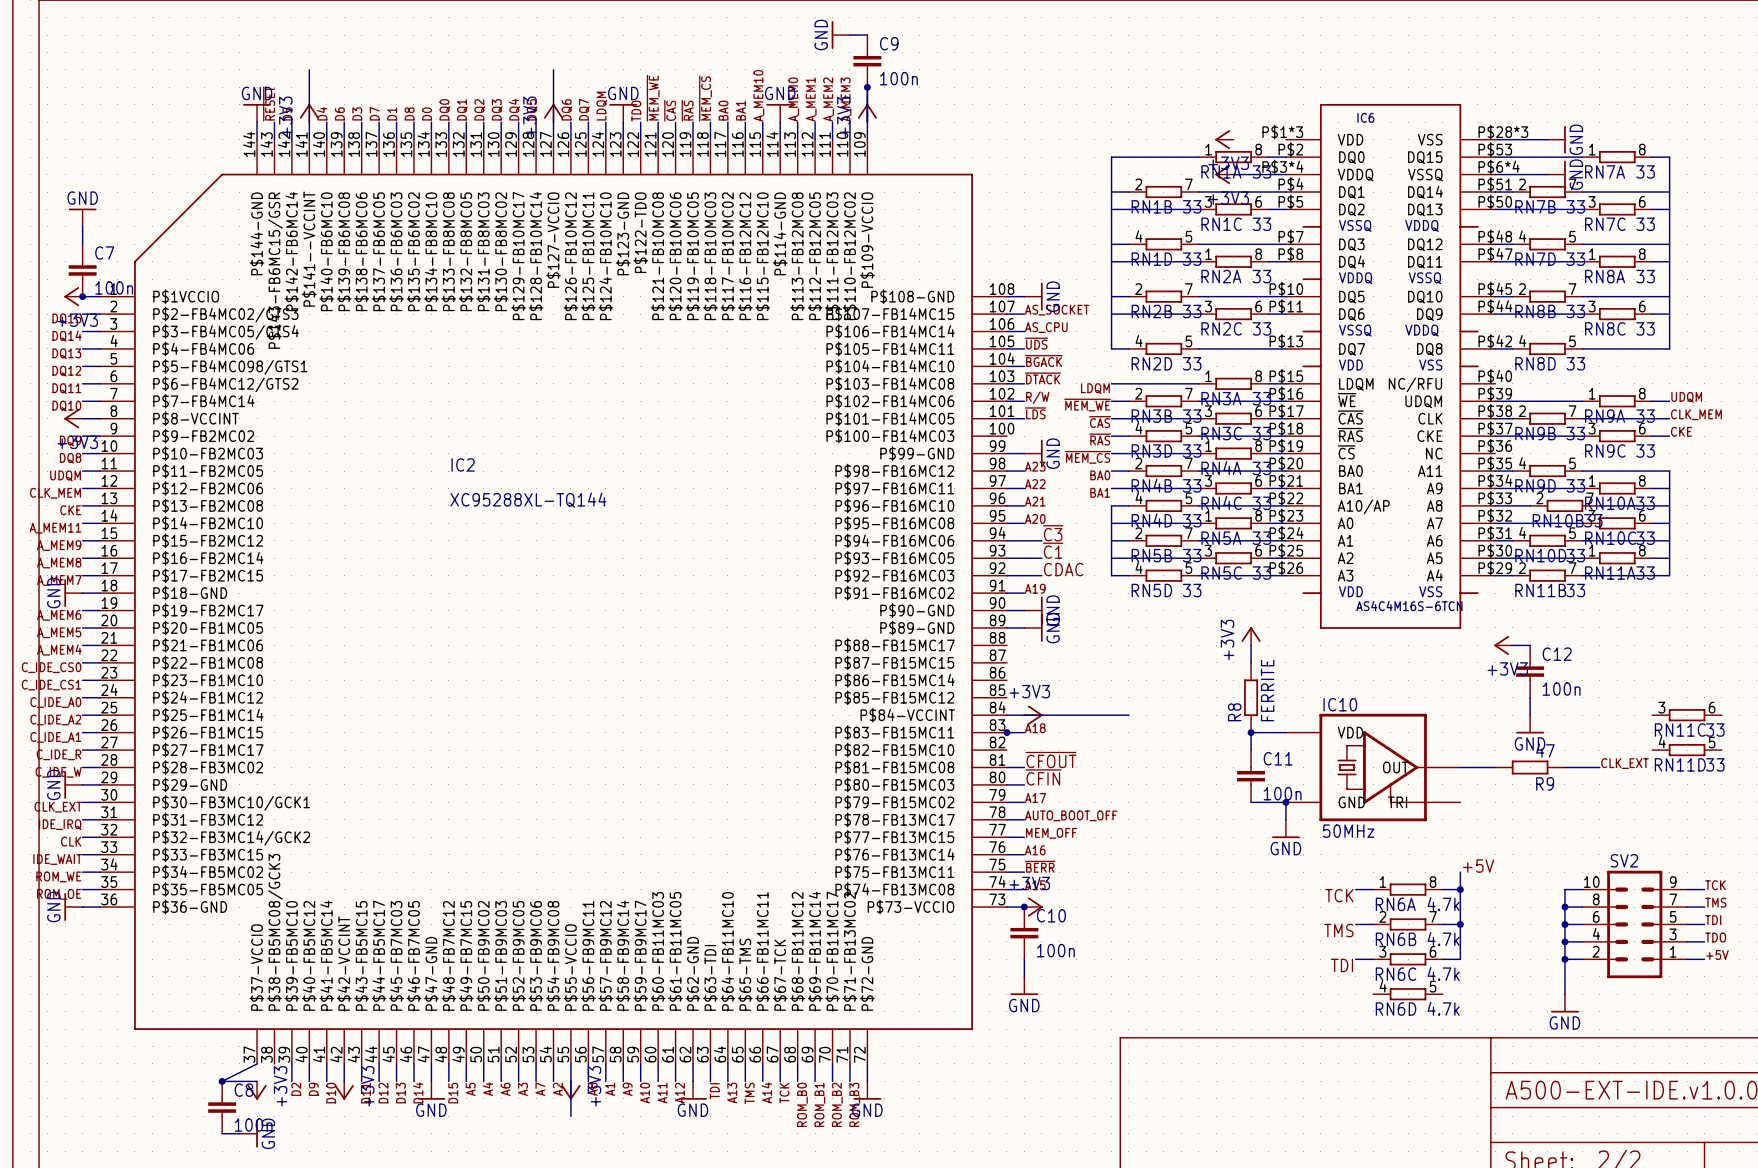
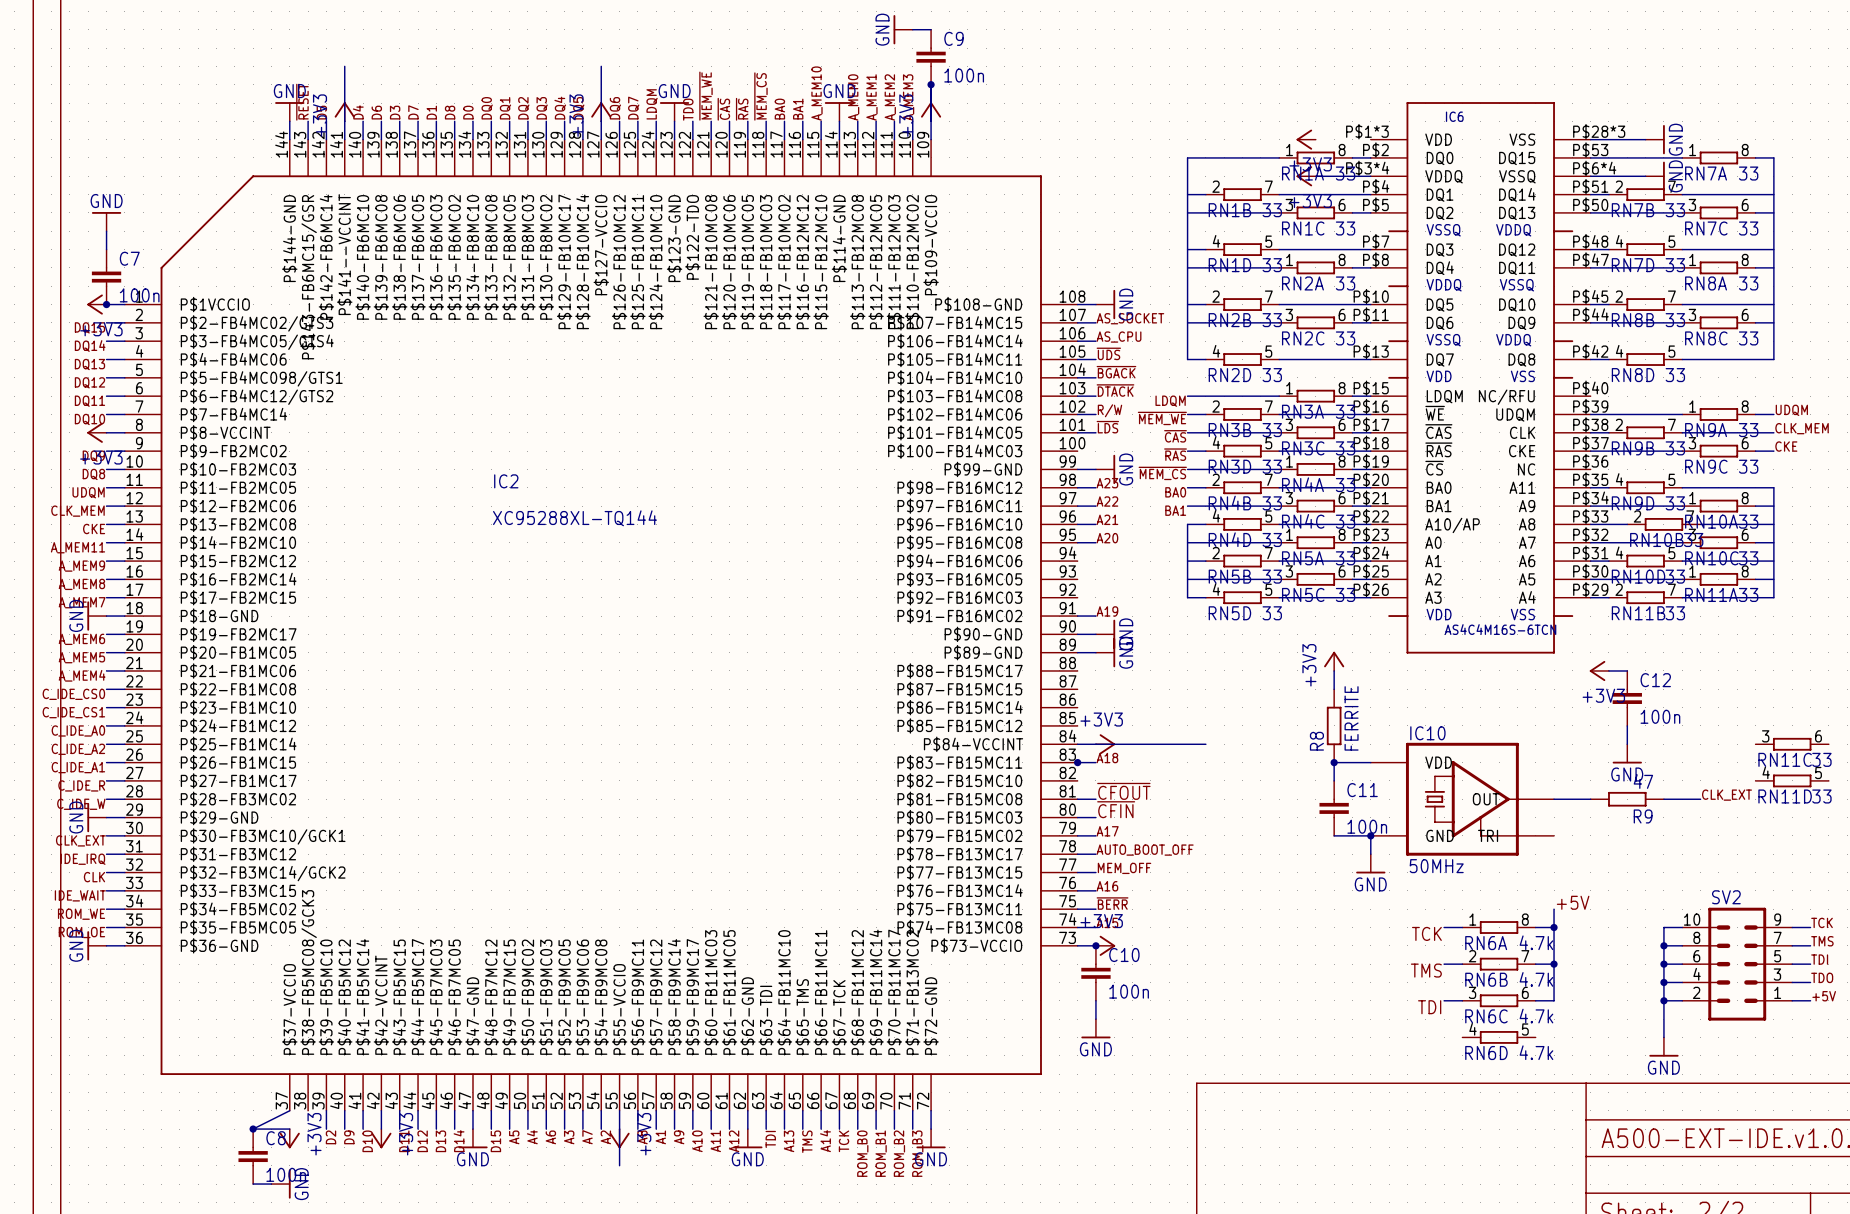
label: ~{C3} (1053, 533) -> none
wire: (1006, 540) (1041, 540) -> none
label: ~{C1} (1053, 550) -> none
wire: (1006, 558) (1041, 558) -> none
label: CDAC (1063, 569) -> none
wire: (1006, 575) (1041, 575) -> none

